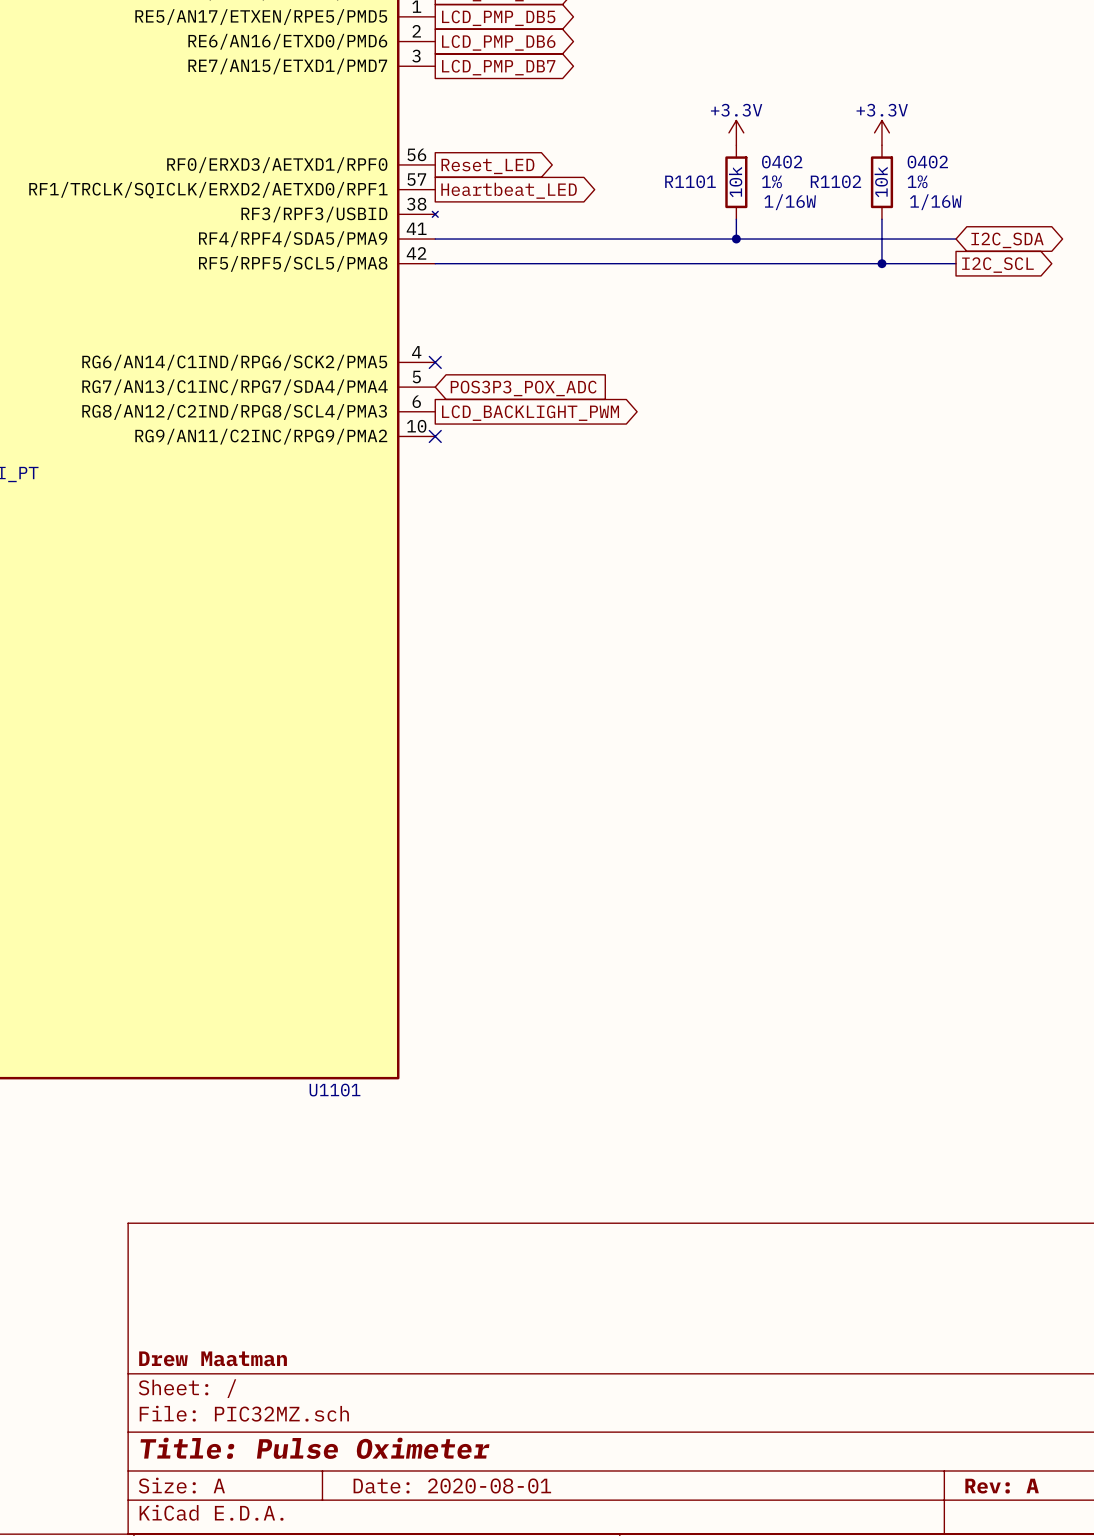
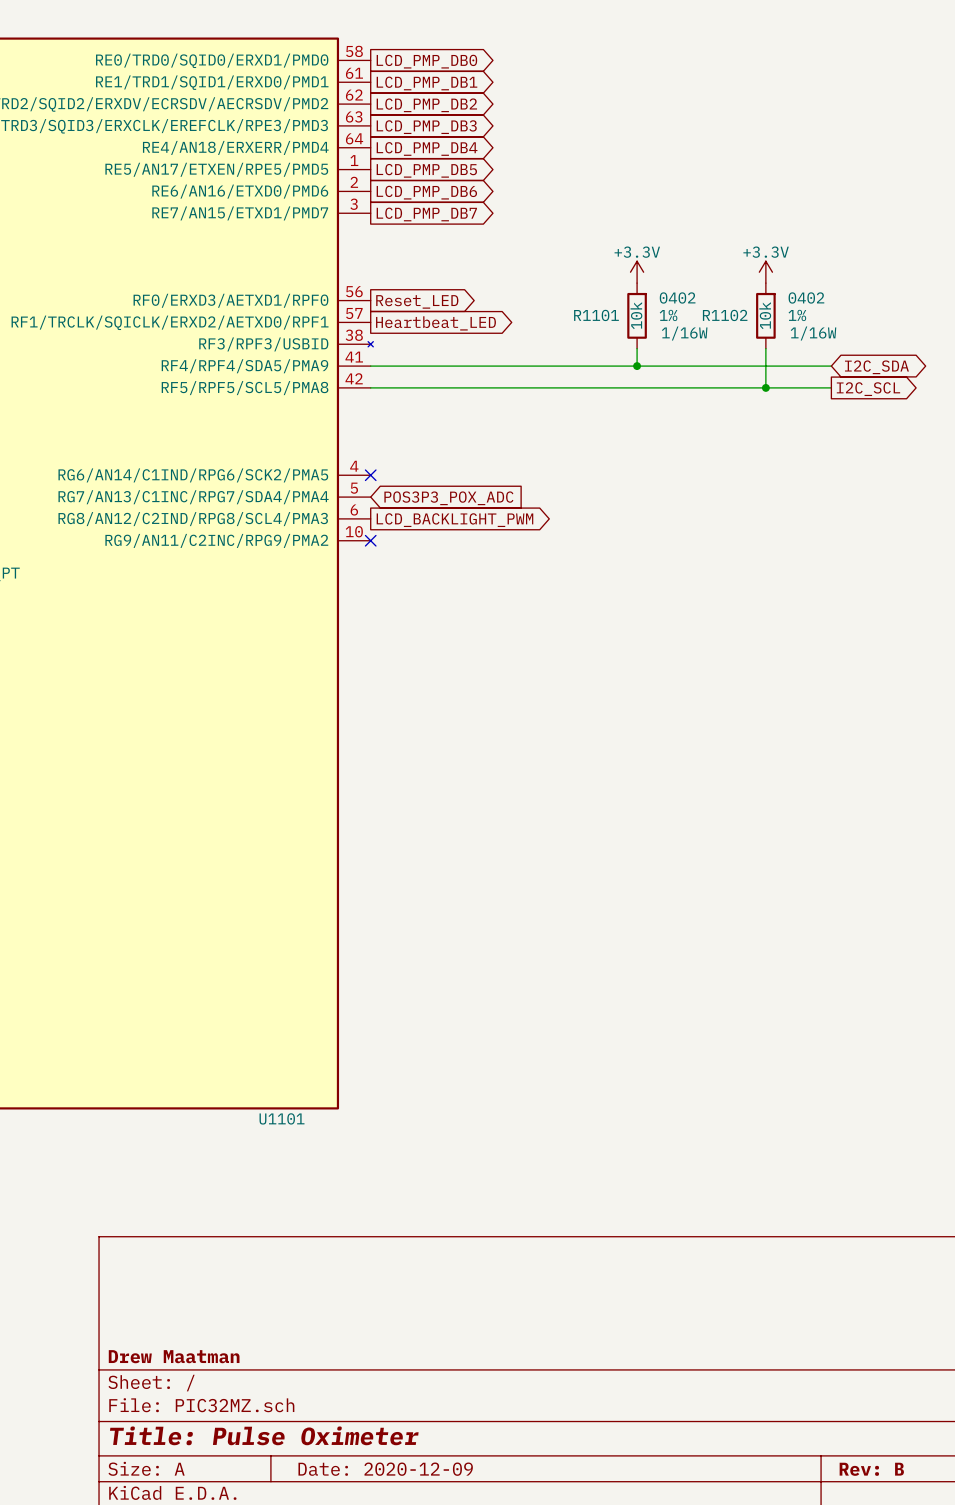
title block: Date: 2020-08-01 (452, 1485) -> Date: 2020-12-09 (385, 1469)
title block: Rev: A (1002, 1486) -> Rev: B (871, 1469)

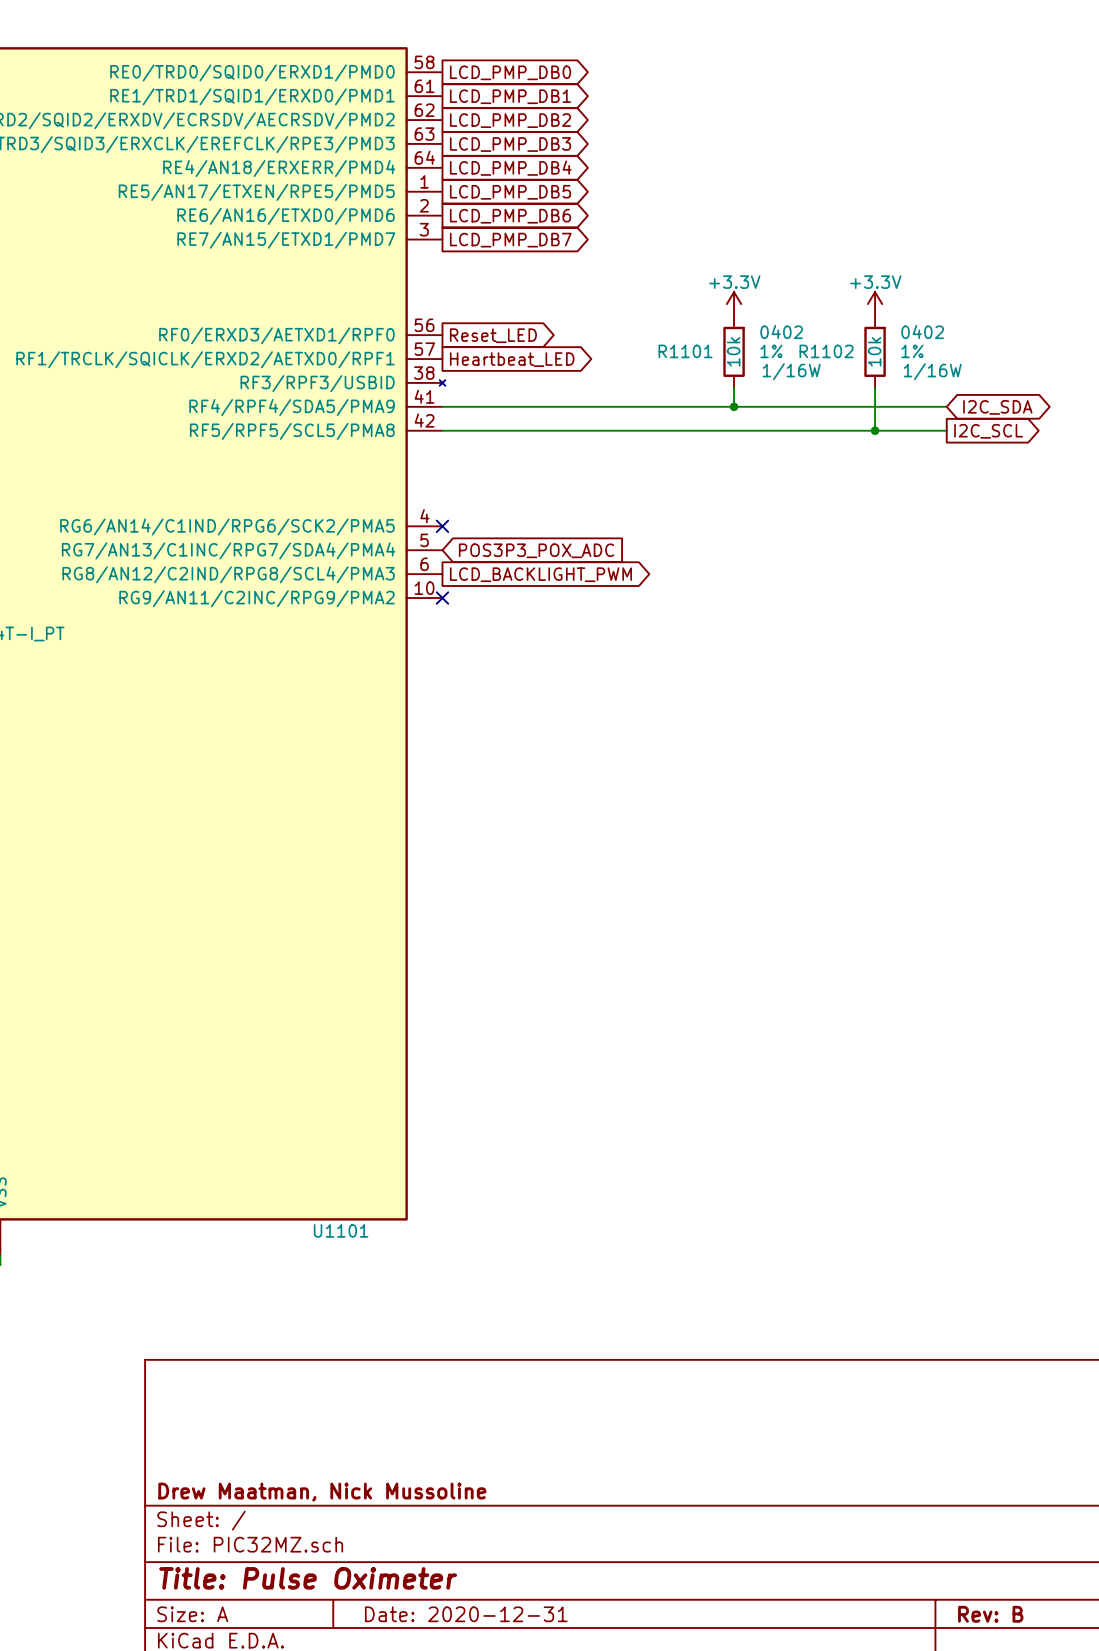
title block: Drew Maatman (174, 1356) -> Drew Maatman, Nick Mussoline (322, 1492)
title block: Date: 2020-12-09 (385, 1469) -> Date: 2020-12-31 (466, 1614)

